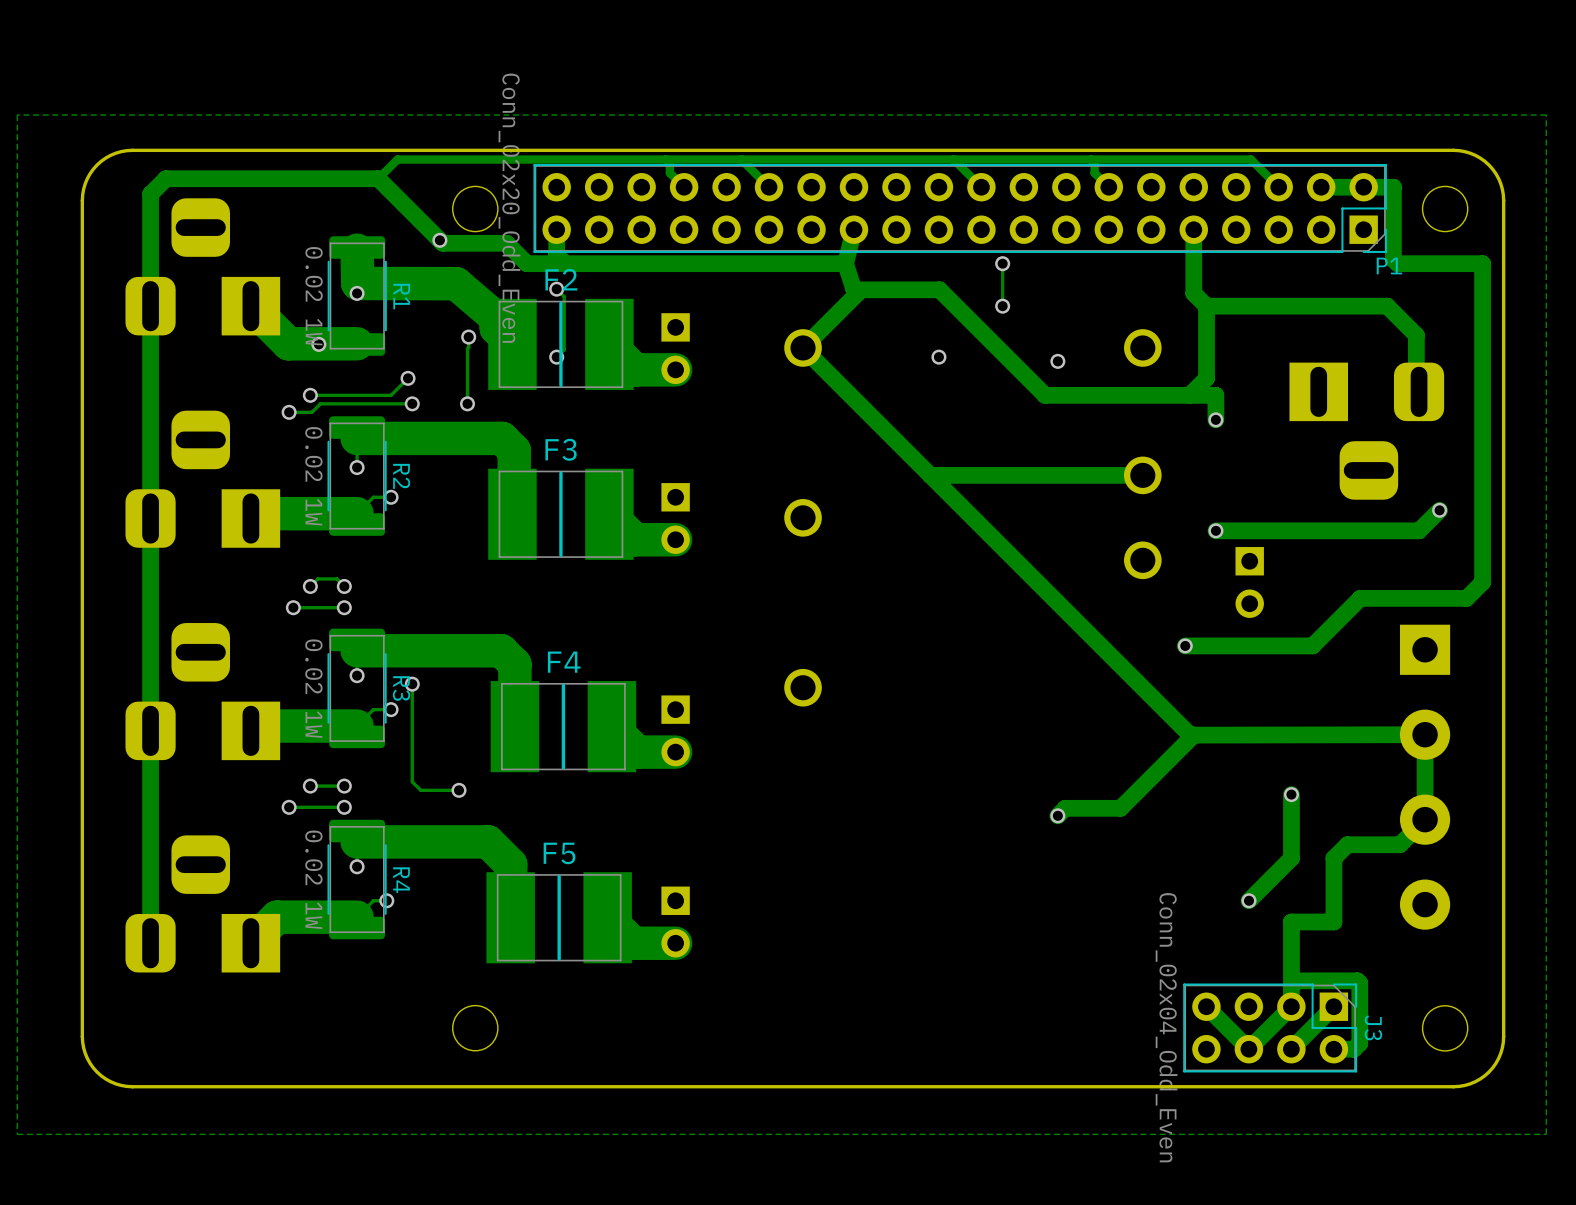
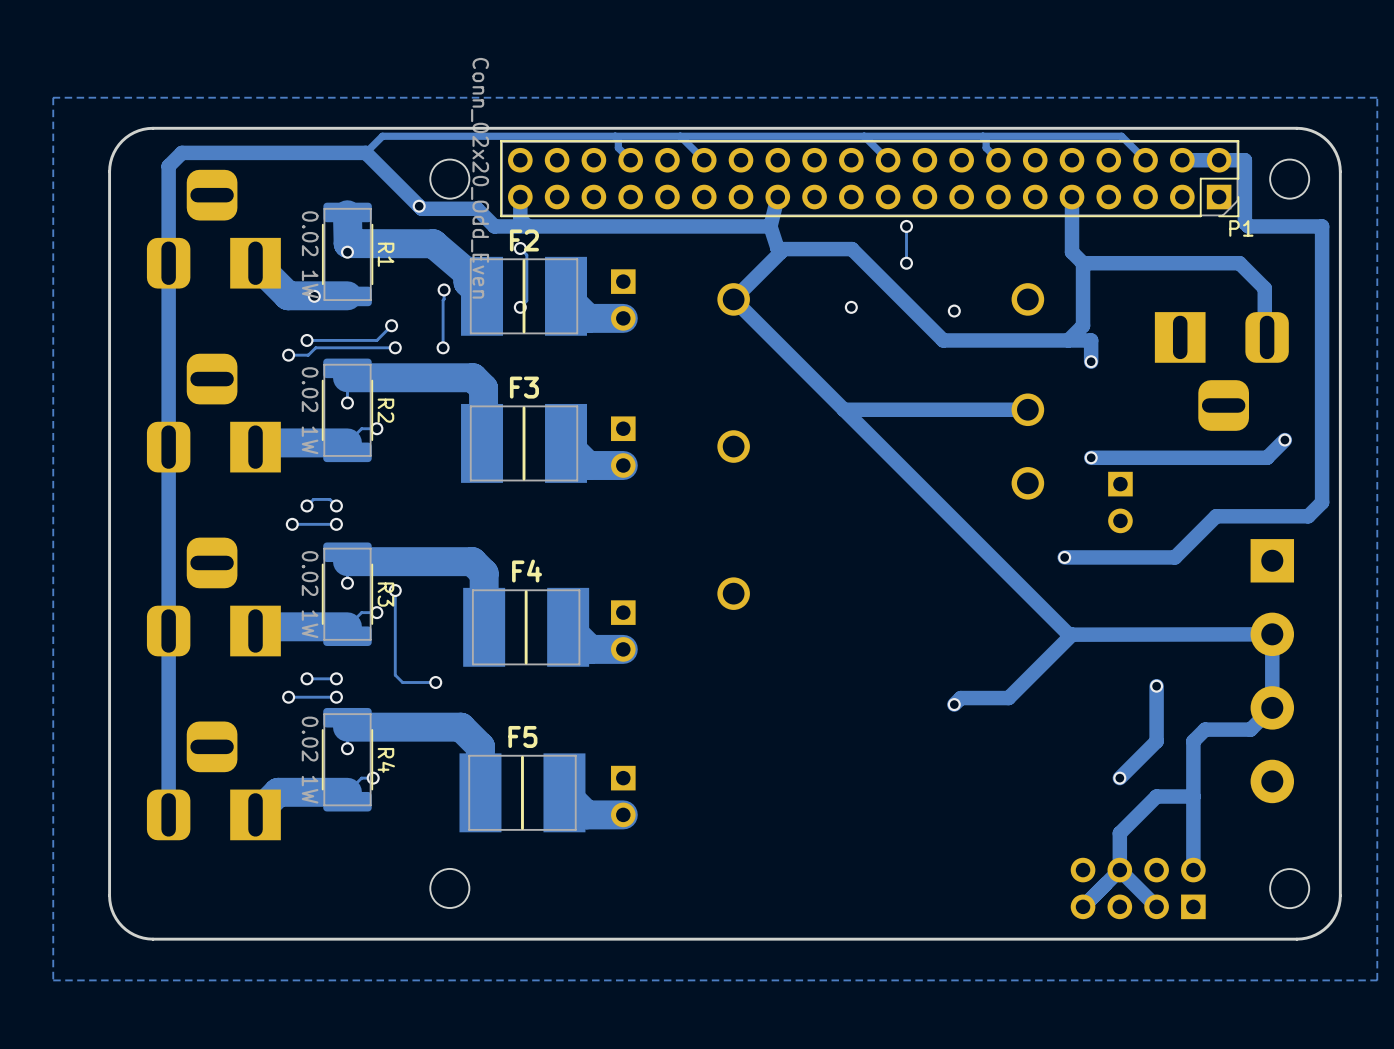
track: (1291, 922) (1291, 986) -> (1156, 796) (1119, 833) (1119, 870)
track: none -> (1193, 796) (1193, 870)
track: (1206, 1006) (1248, 1049) (1291, 1006) (1291, 986) (1297, 980) (1357, 980) (1359, 983) (1359, 1043) (1353, 1049) (1333, 1049) -> none
track: none -> (1119, 870) (1083, 906)
track: (1333, 1006) (1291, 1049) -> (1119, 870) (1156, 906)
J3 side: bottom (1270, 1027) -> top (1138, 888)

